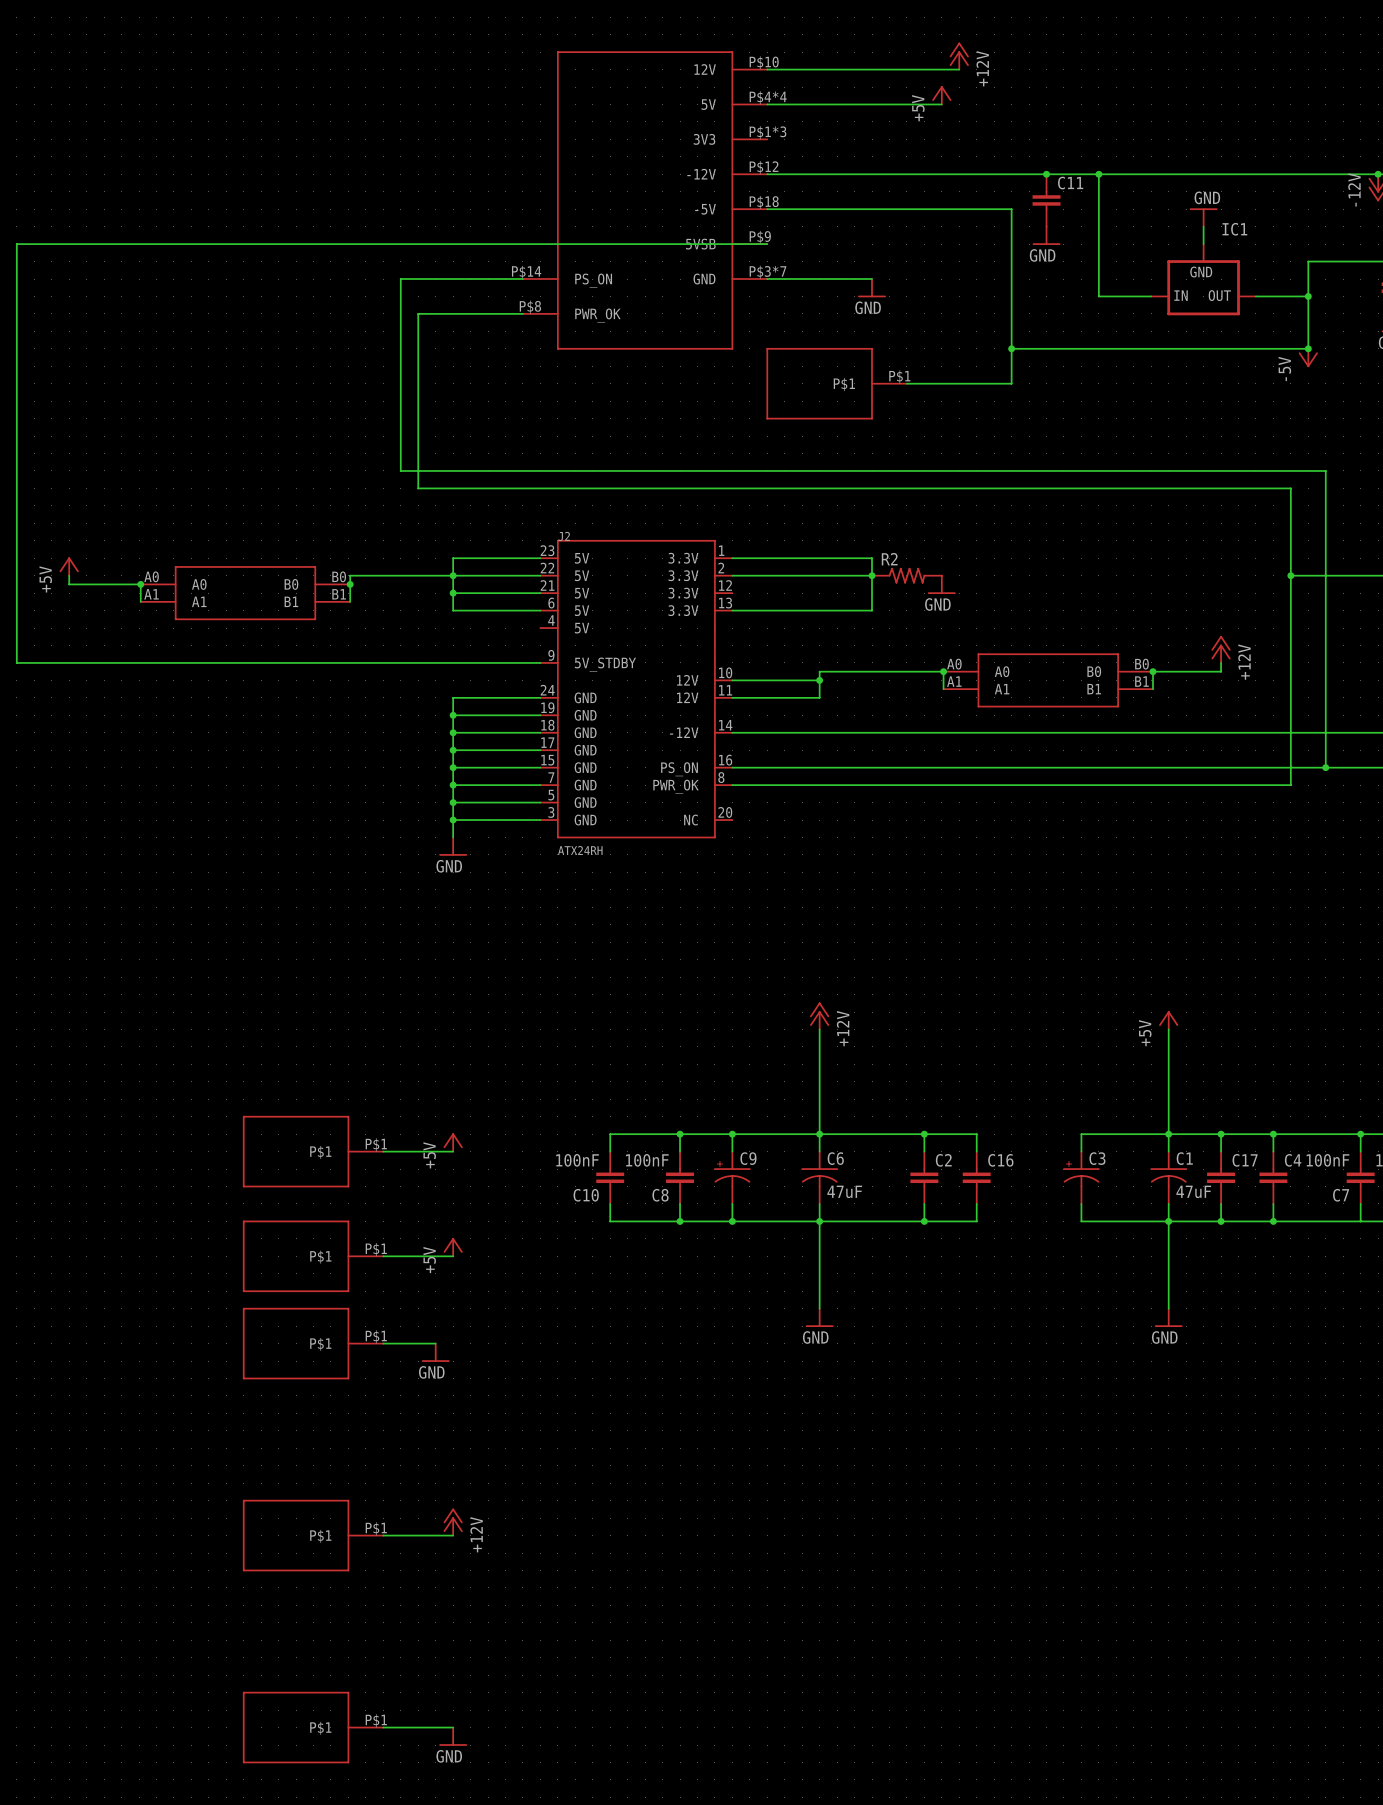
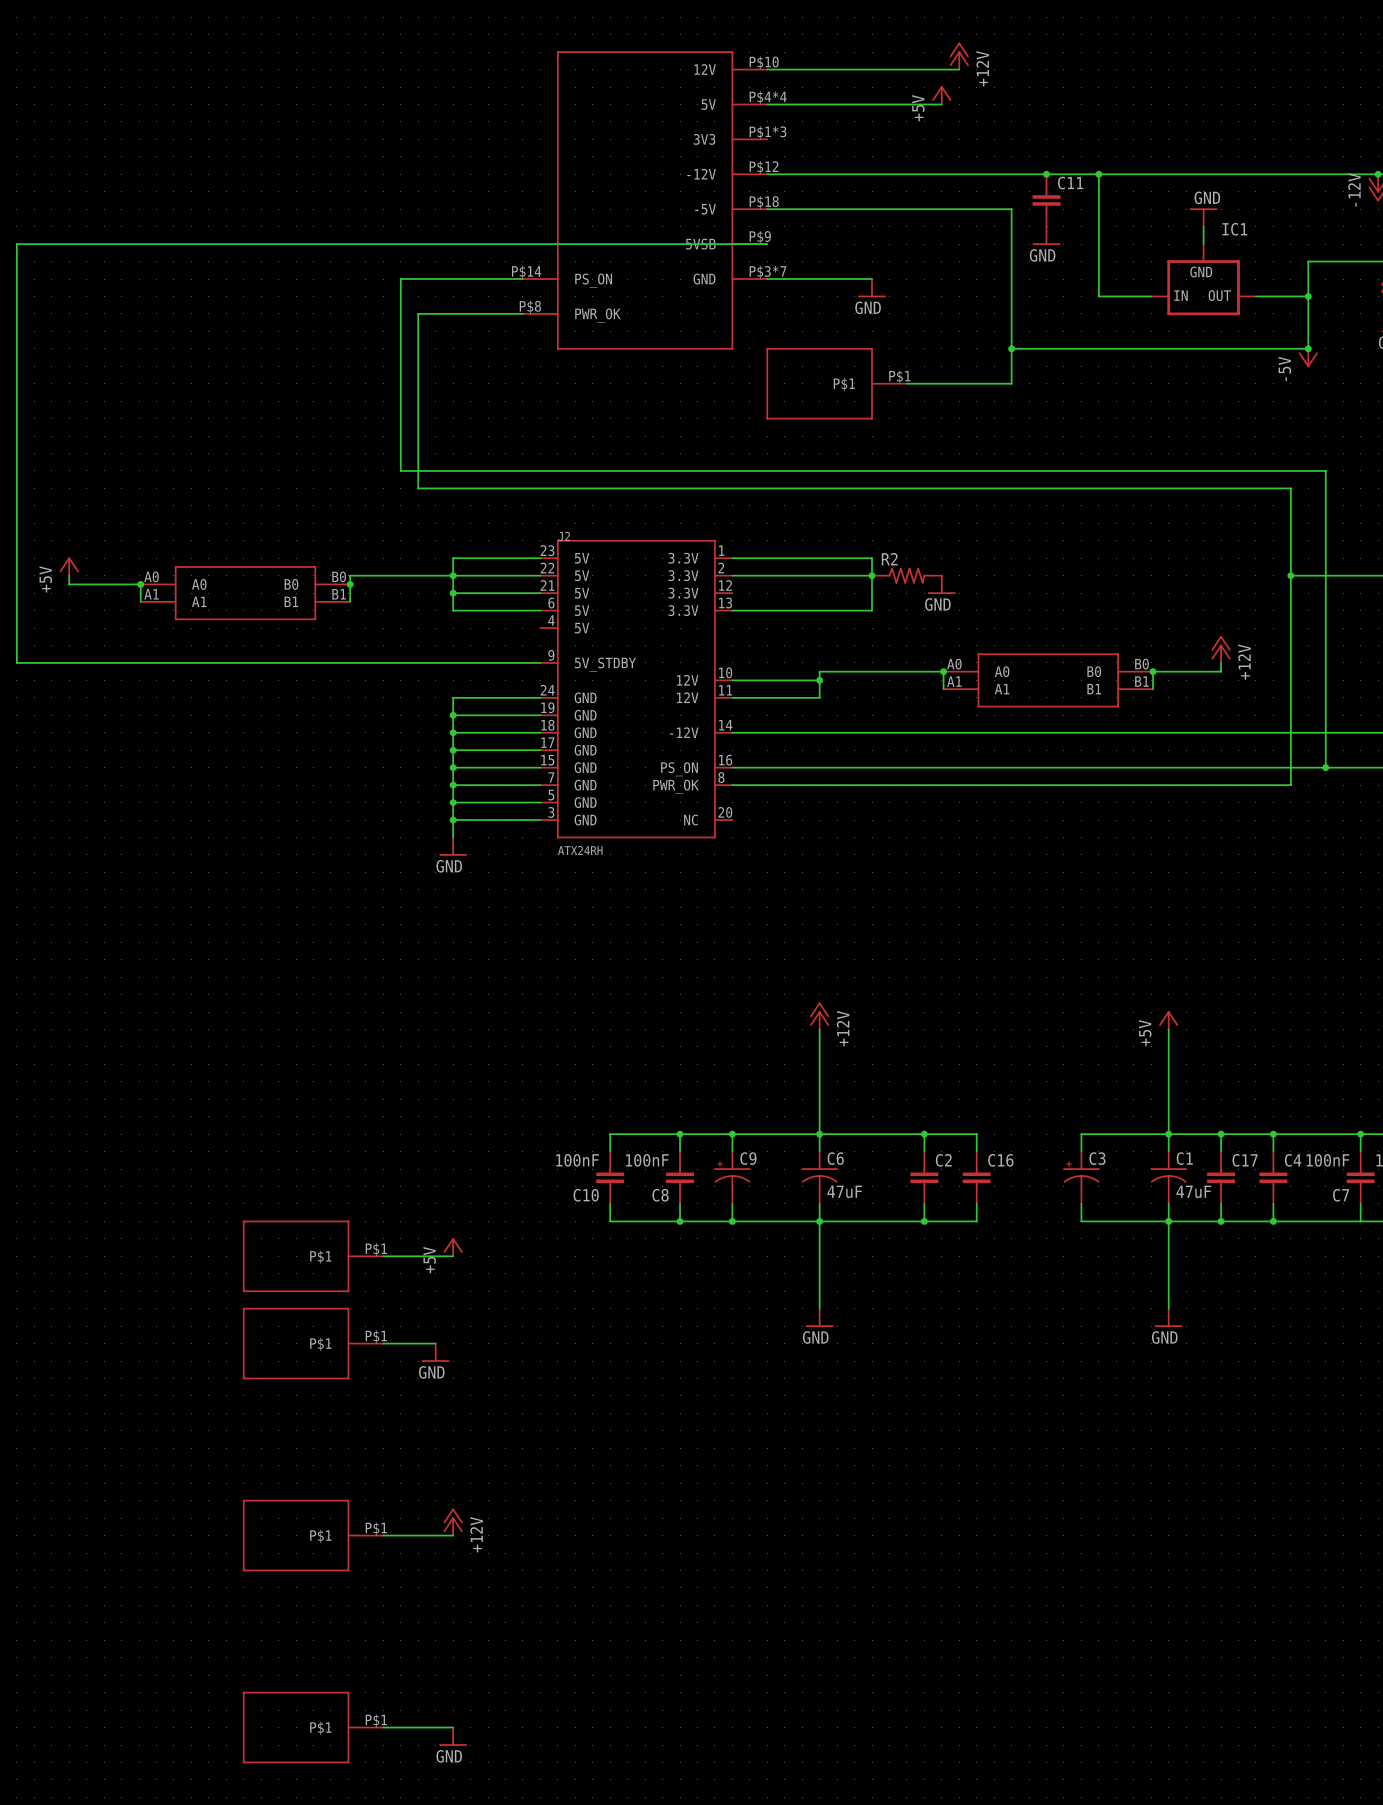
power symbol: +5V (453, 1142) -> none
part: (313, 1151) -> none
wire: (383, 1151) (453, 1151) -> none

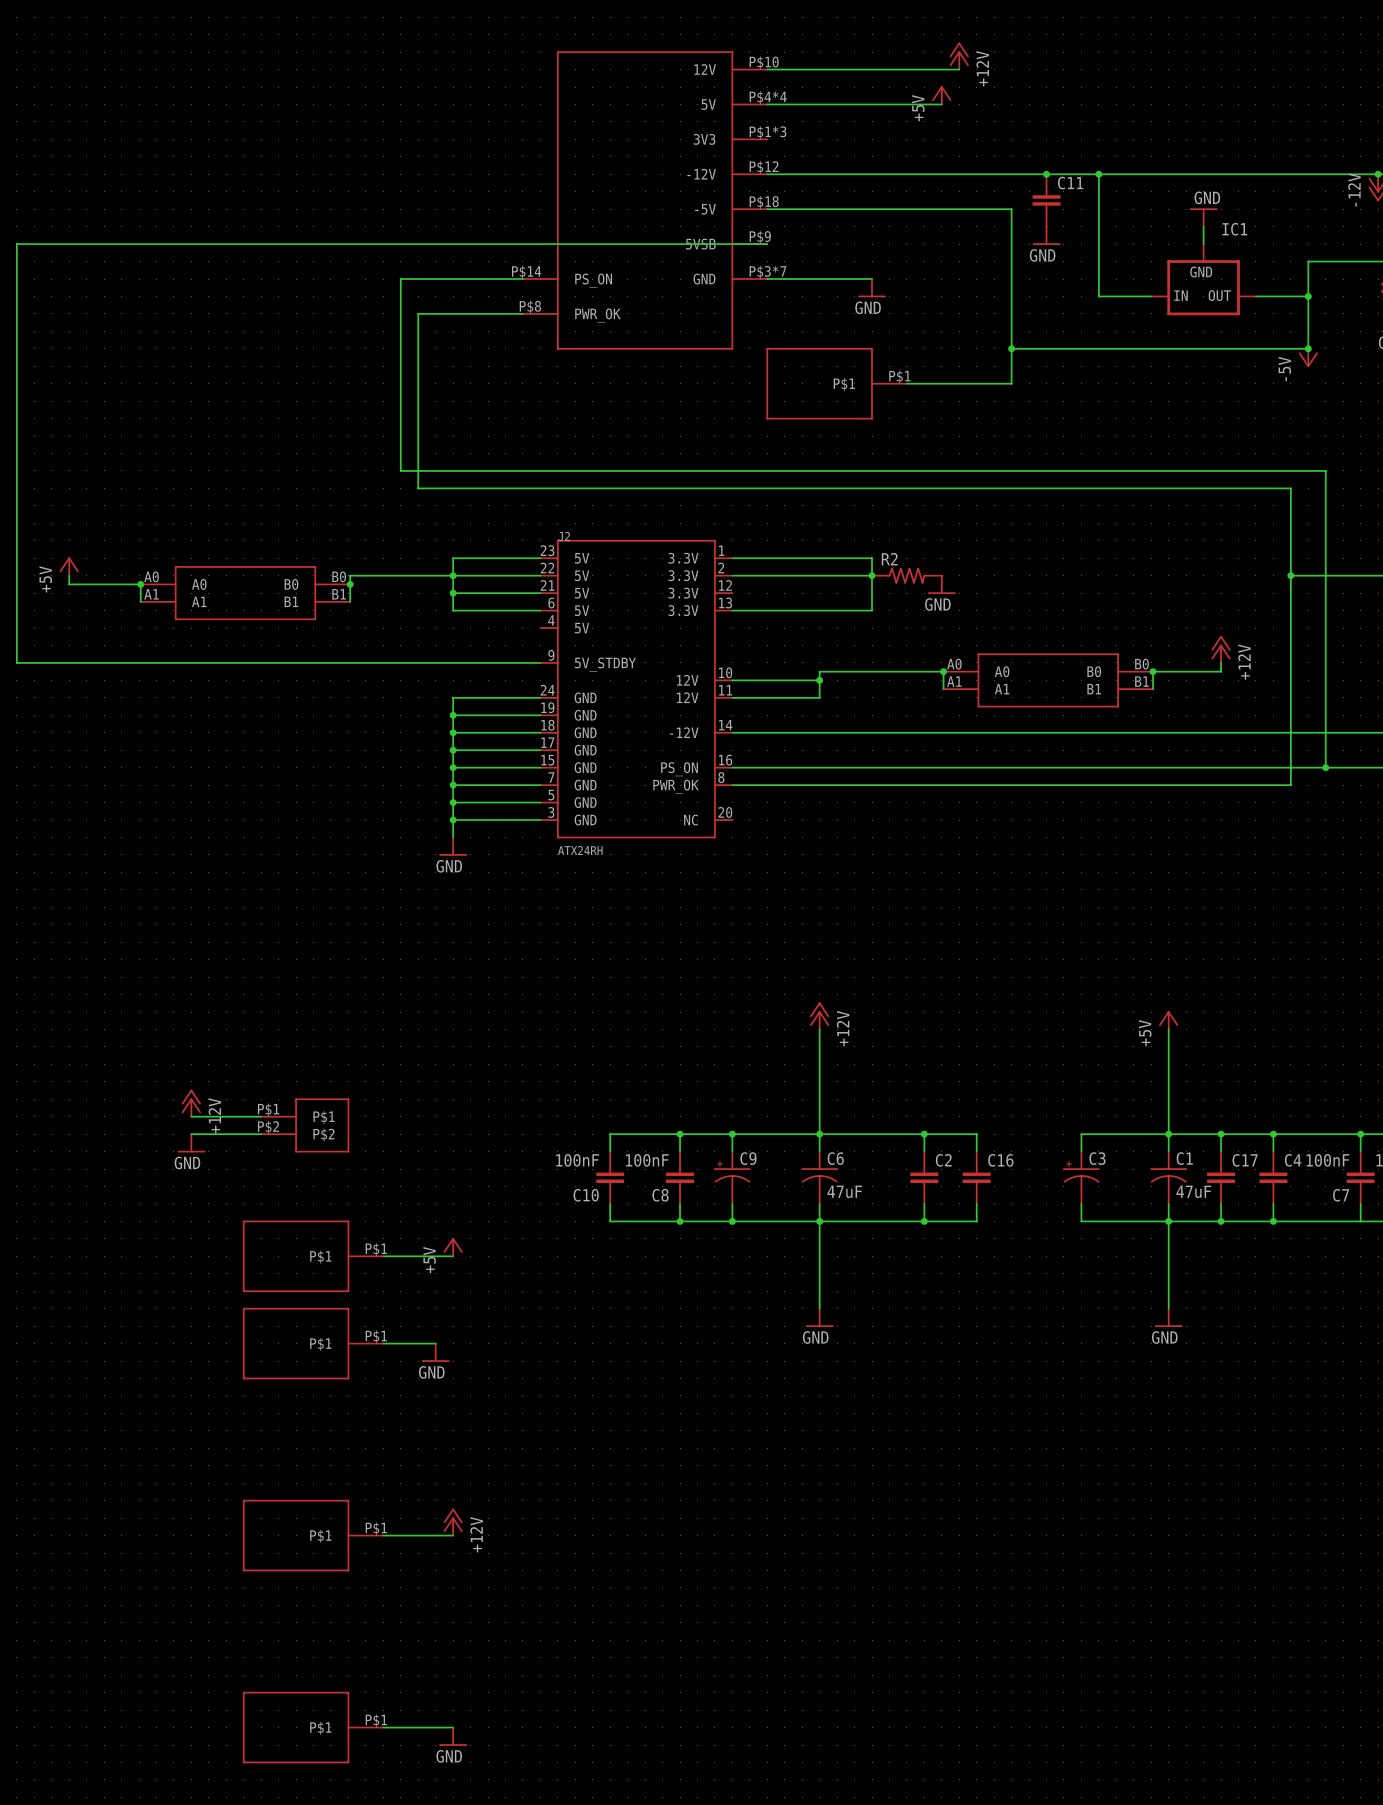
power symbol: none -> +12V (191, 1103)
wire: none -> (191, 1116) (261, 1116)
part: none -> (305, 1125)
wire: none -> (191, 1134) (261, 1134)
power symbol: none -> GND (191, 1143)

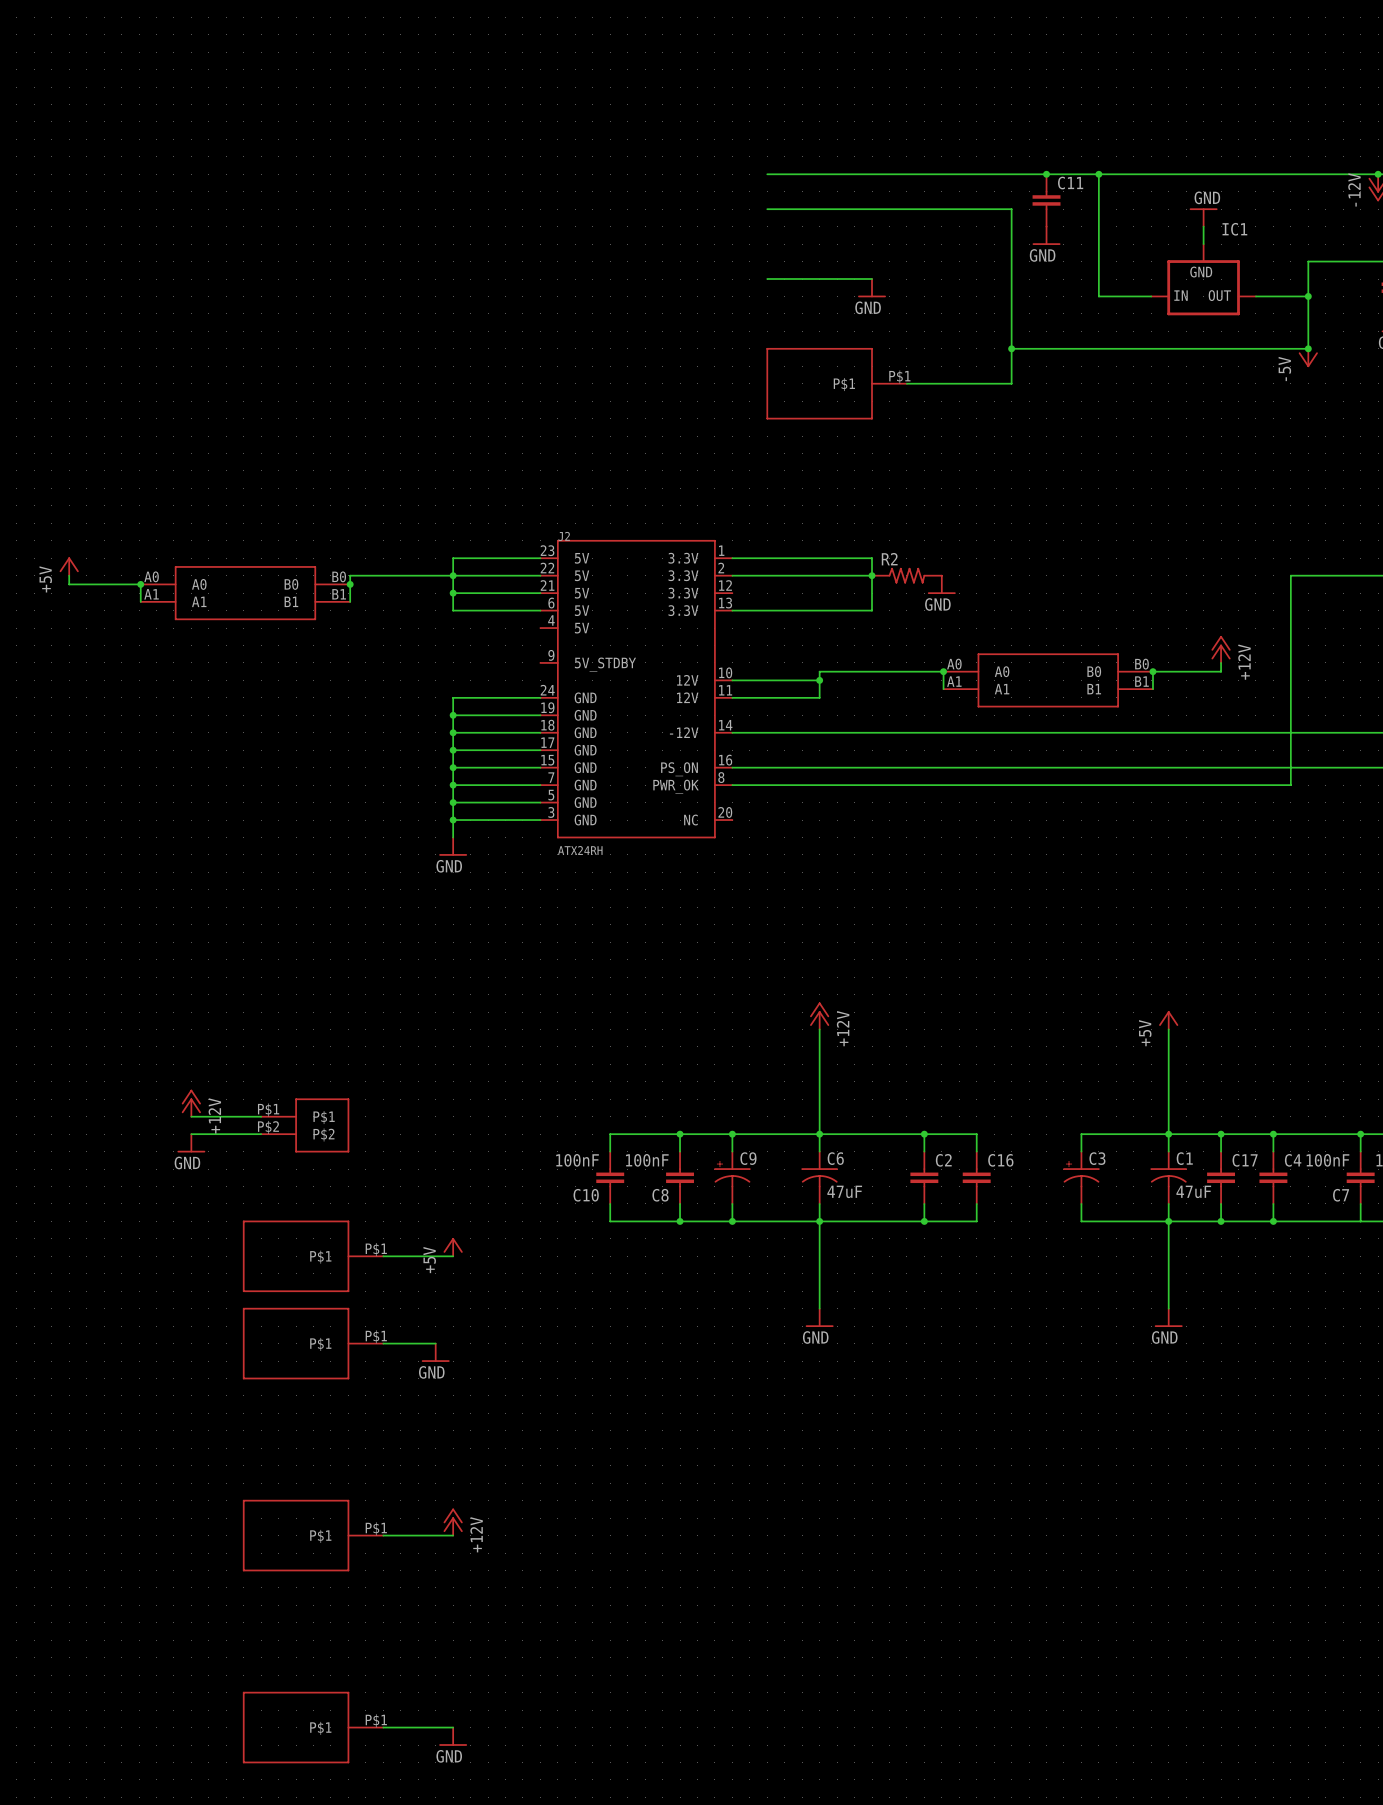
power symbol: +12V (959, 56) -> none
wire: (767, 69) (959, 69) -> none
power symbol: +5V (941, 95) -> none
wire: (767, 104) (941, 104) -> none
part: (645, 200) -> none
wire: (767, 244) (16, 244) (16, 662) (540, 662) -> none
wire: (522, 279) (400, 279) (400, 470) (1325, 470) (1325, 767) -> none
wire: (522, 313) (418, 313) (418, 488) (1290, 488) (1290, 575) -> none
junction: (1290, 575) -> none
junction: (1325, 767) -> none

